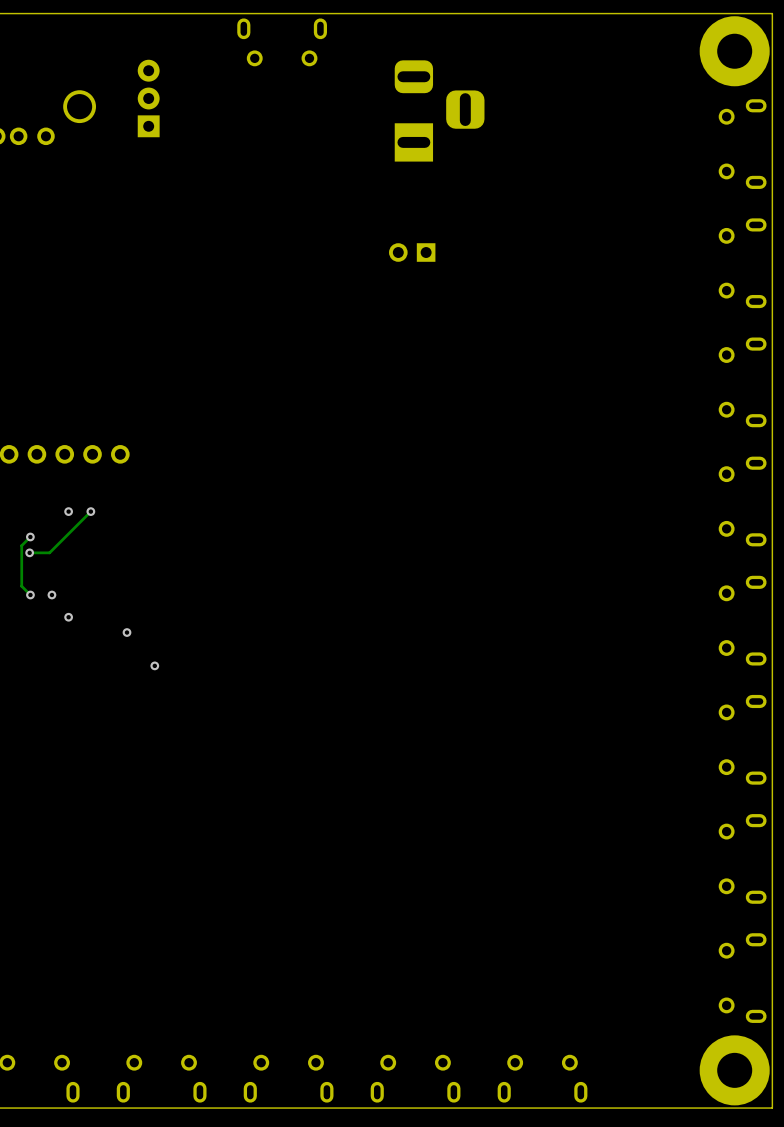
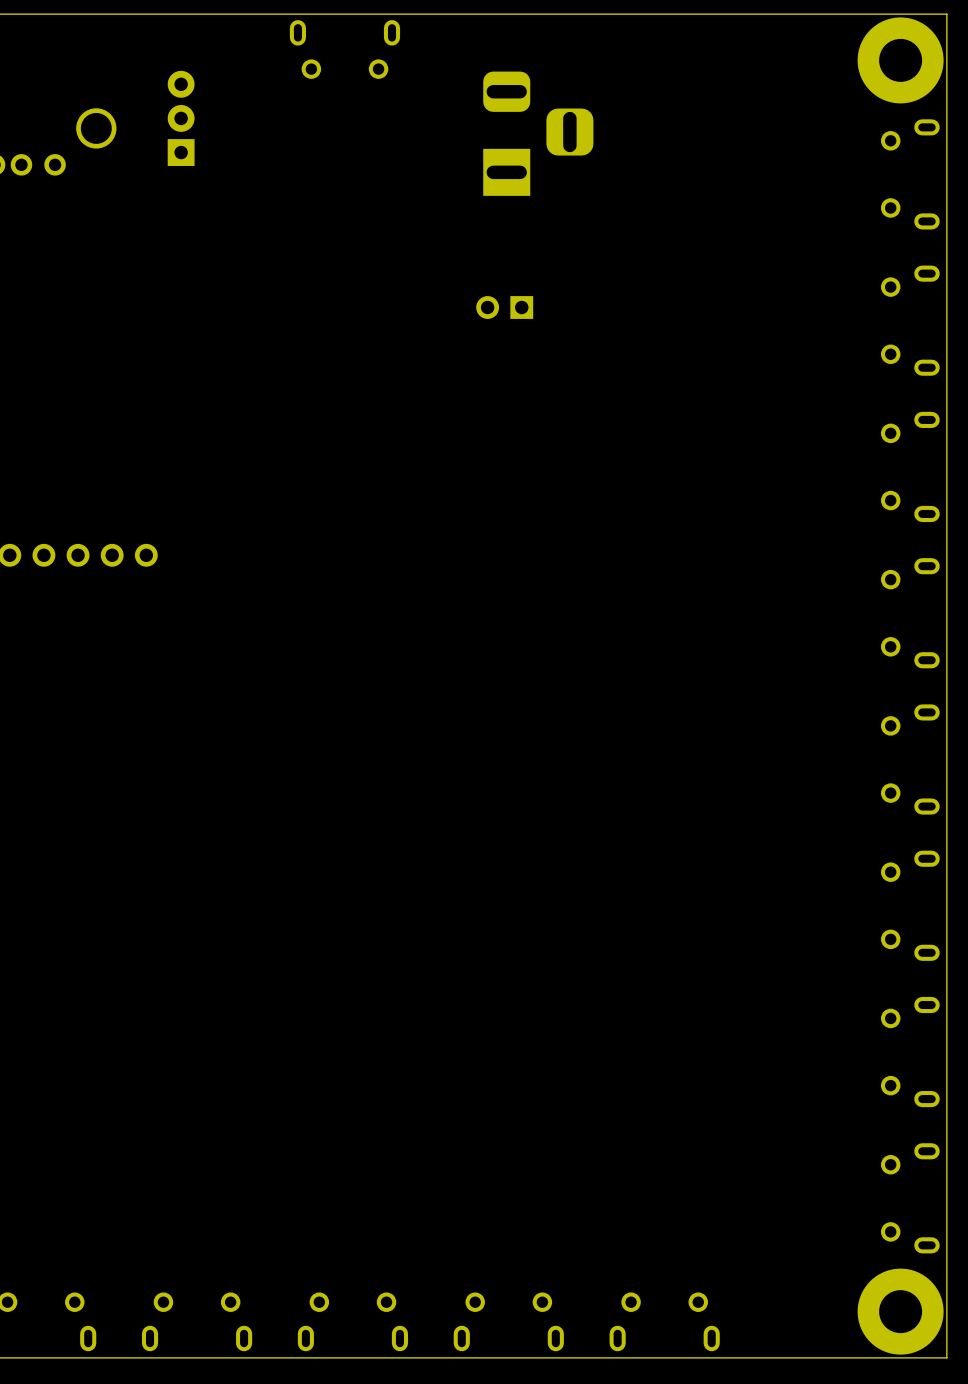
via: (68, 511) -> none
track: (90, 511) (49, 552) (29, 552) -> none
via: (90, 511) -> none
track: (30, 536) (21, 545) (21, 586) (30, 595) -> none
via: (30, 536) -> none
via: (29, 552) -> none
via: (30, 595) -> none
via: (51, 595) -> none
via: (68, 617) -> none
via: (127, 632) -> none
via: (154, 665) -> none

